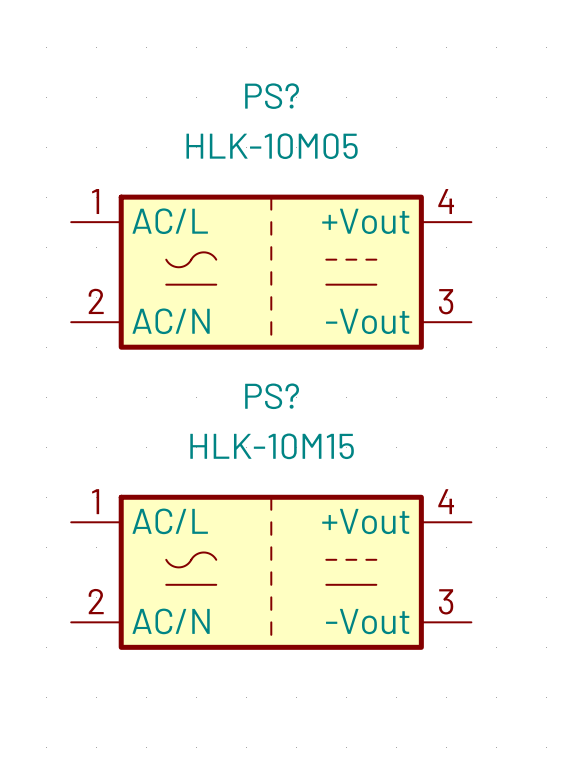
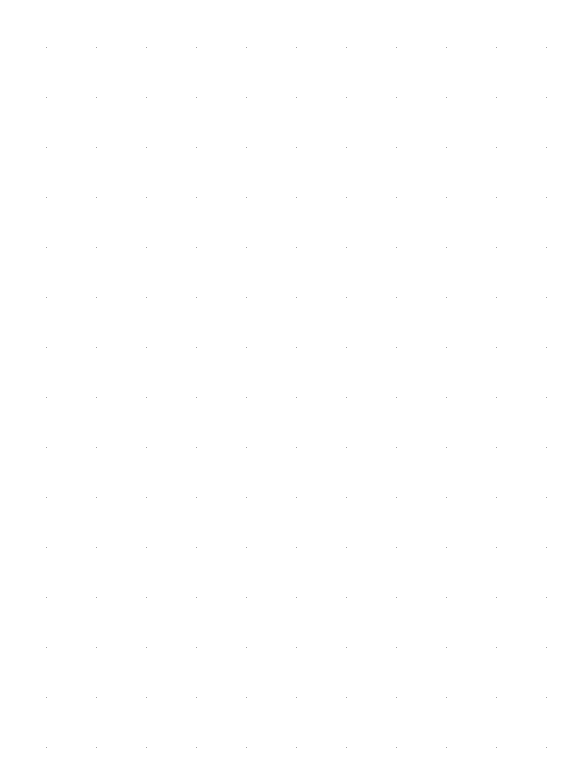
PS?: HLK-10M05 (271, 272) -> none
PS?: HLK-10M15 (271, 572) -> none

